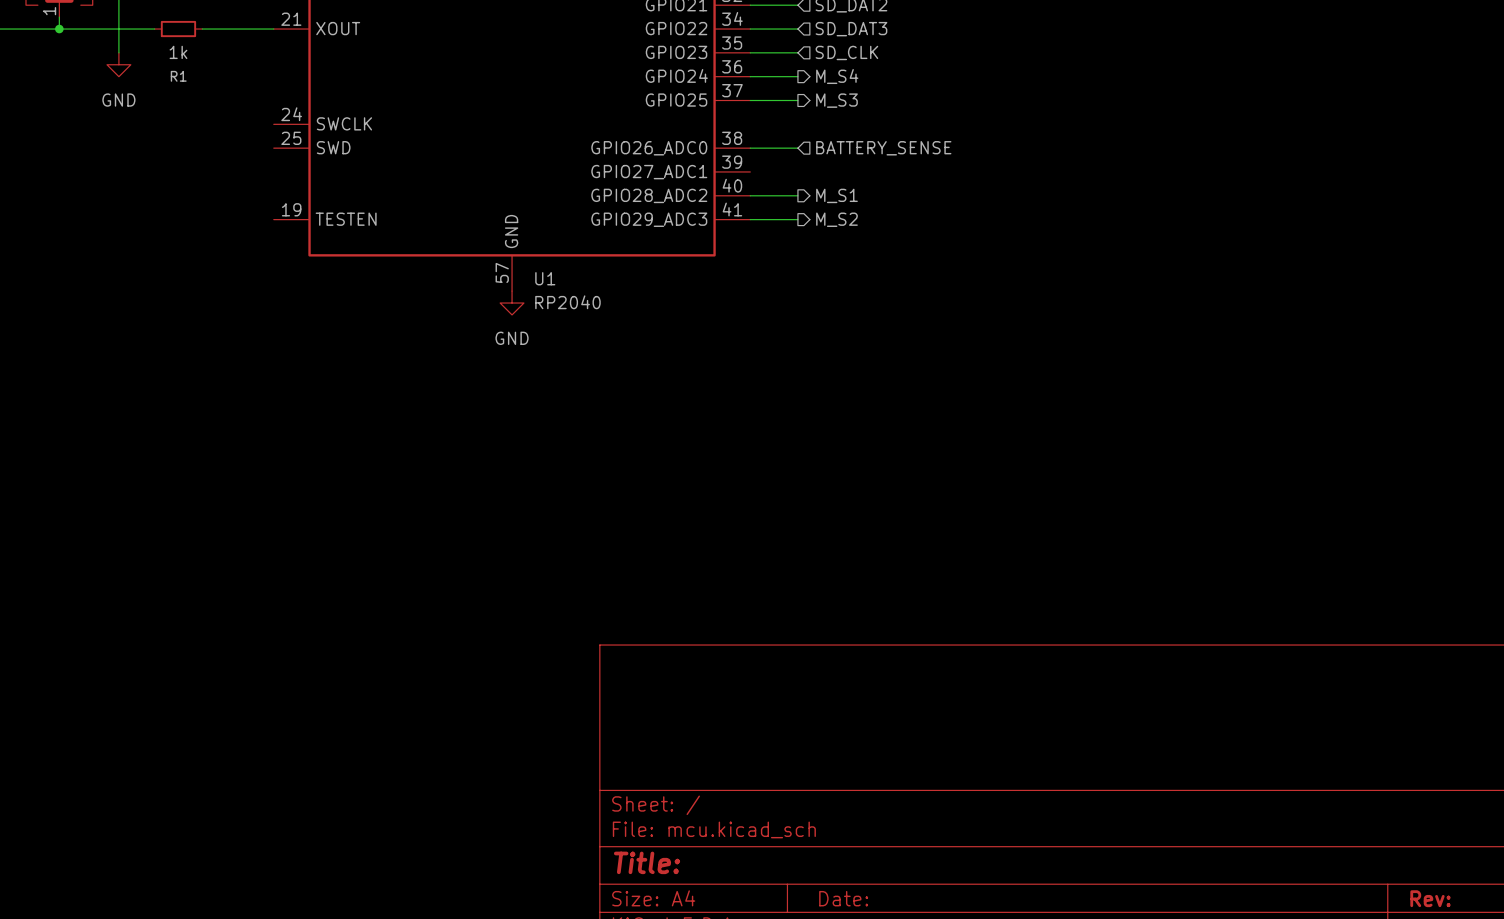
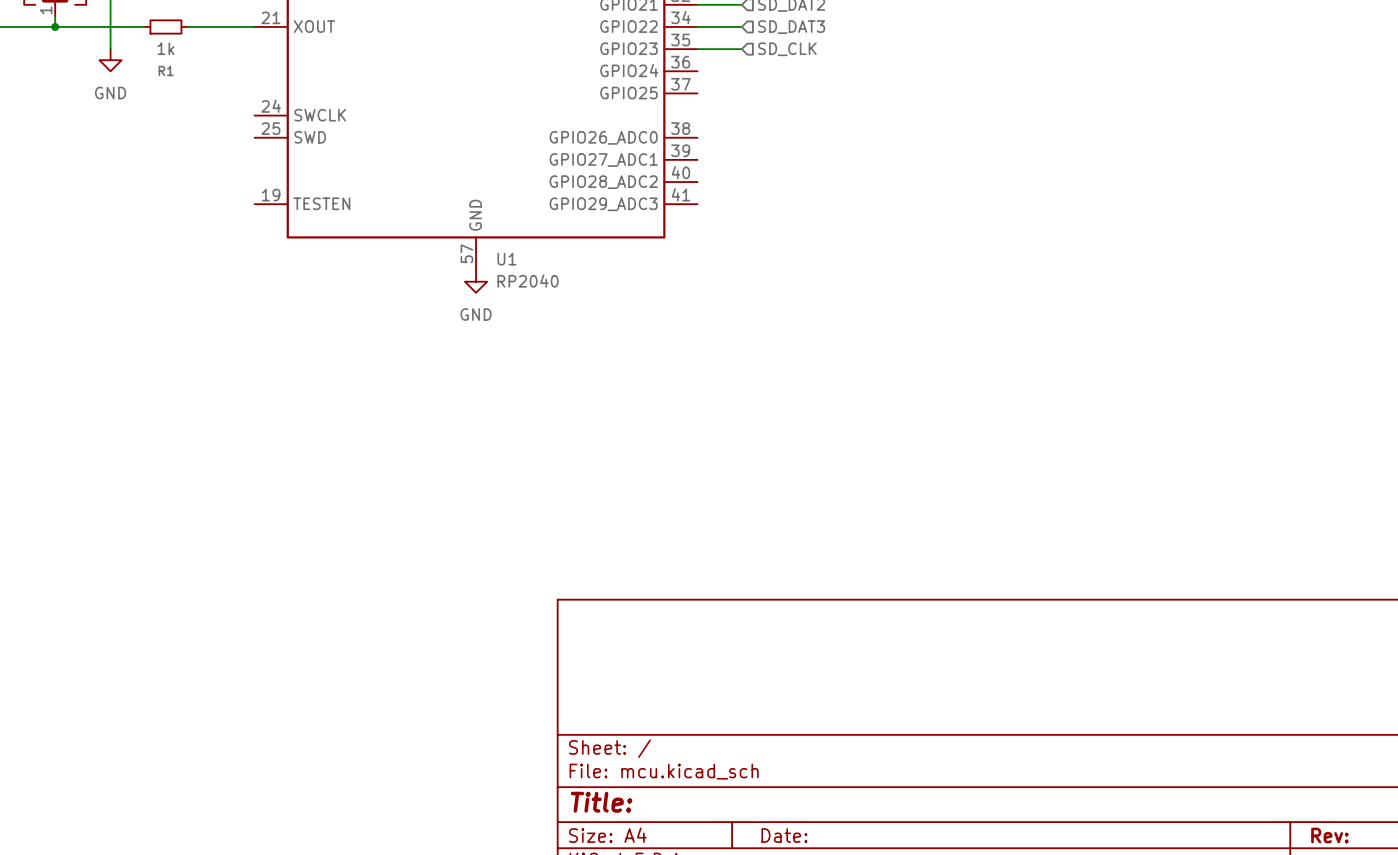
wire: (750, 76) (797, 76) -> none
hierarchical label: M_S4 (837, 76) -> none
wire: (750, 100) (797, 100) -> none
hierarchical label: M_S3 (836, 100) -> none
wire: (750, 148) (797, 148) -> none
hierarchical label: BATTERY_SENSE (883, 148) -> none
wire: (750, 195) (797, 195) -> none
hierarchical label: M_S1 (836, 195) -> none
wire: (750, 219) (797, 219) -> none
hierarchical label: M_S2 (836, 219) -> none

